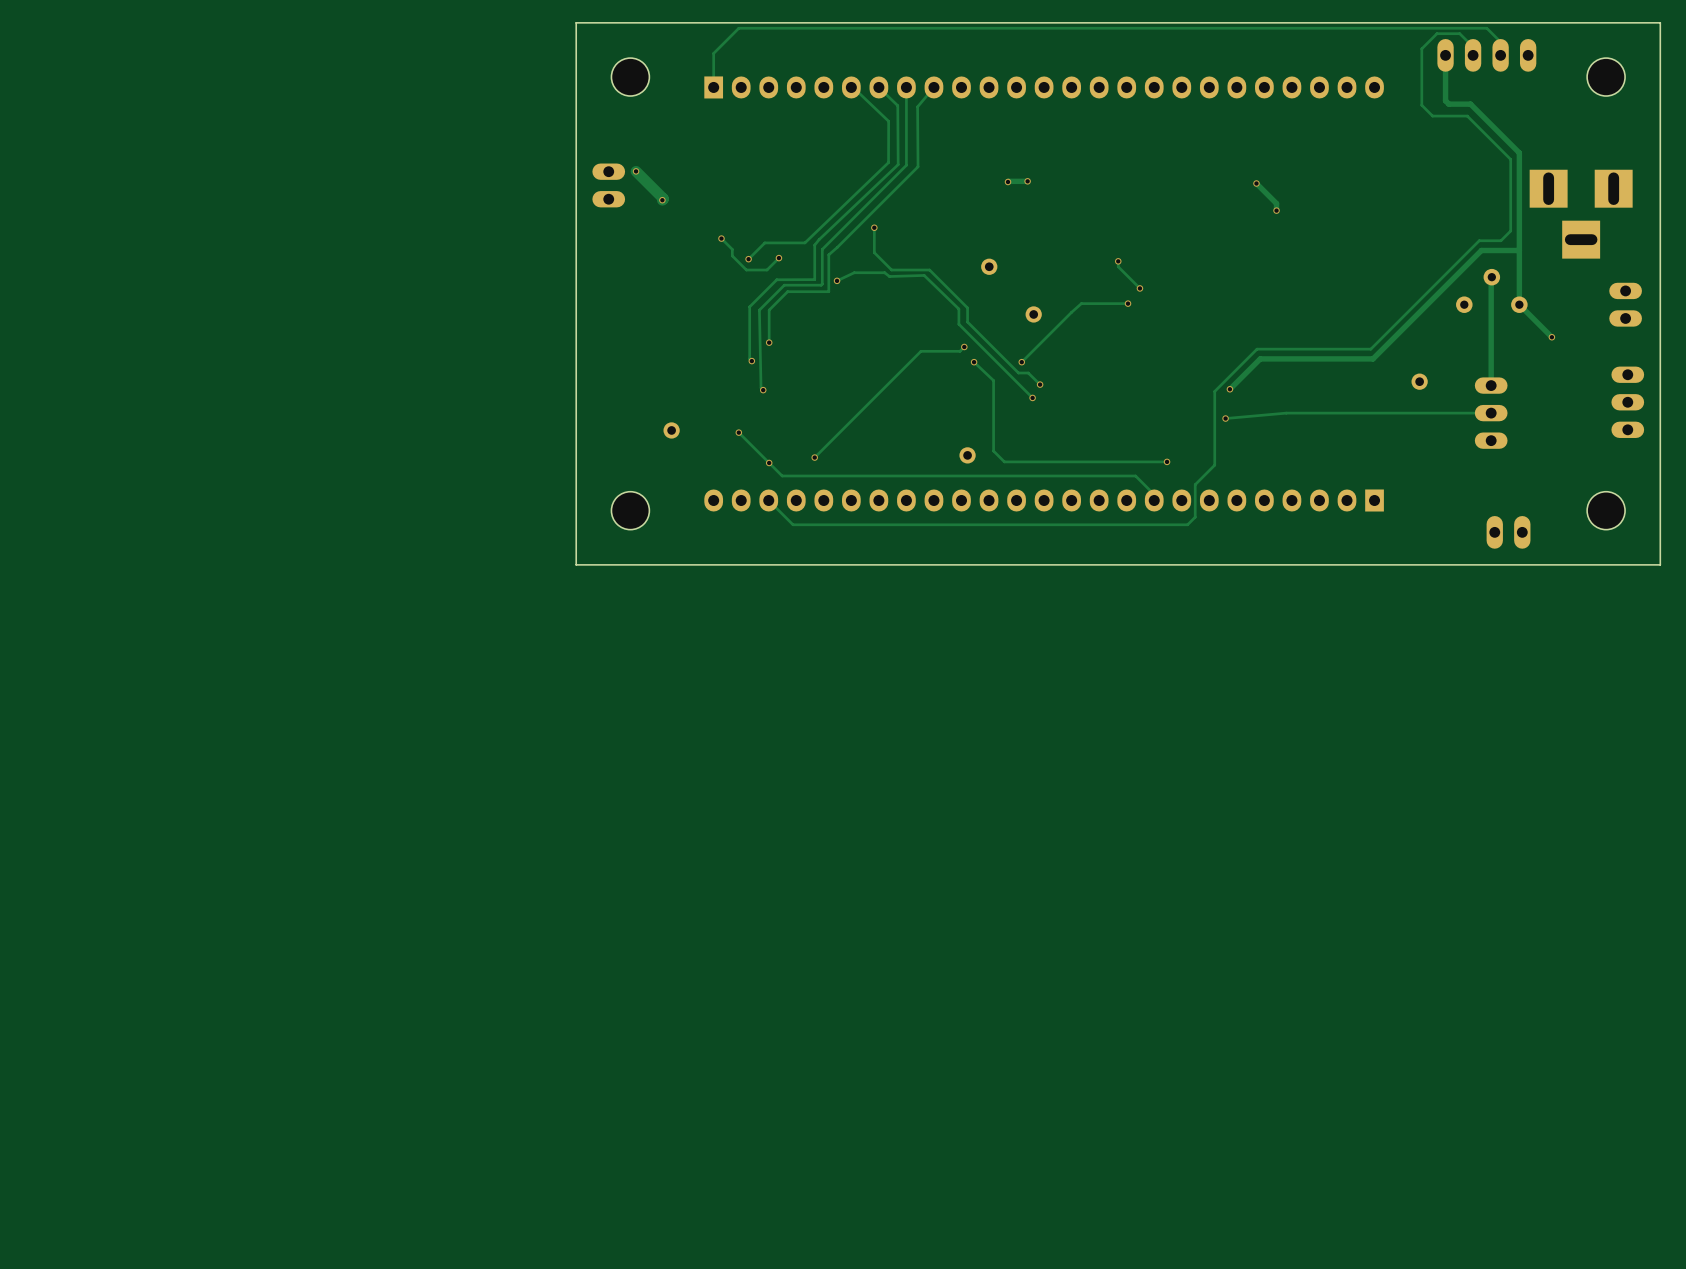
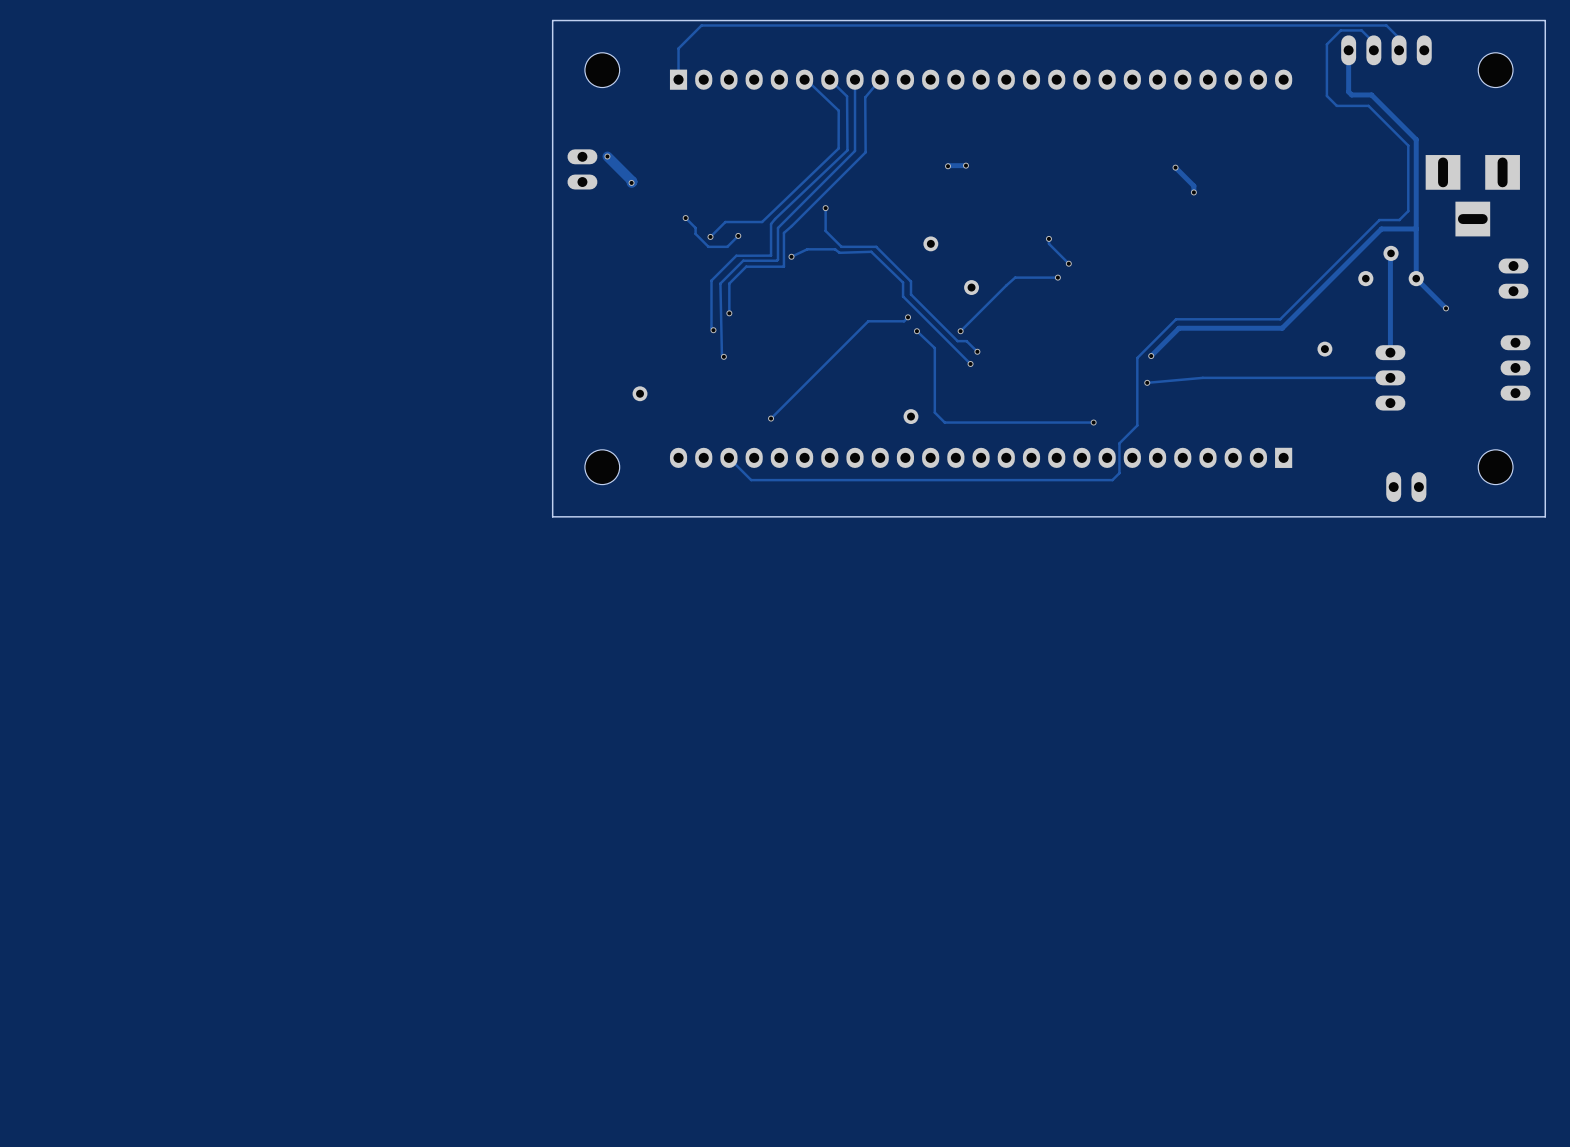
track: (738, 432) (782, 475) (1135, 475) (1154, 494) (1154, 500) -> none
via: (738, 432) -> none
via: (769, 462) -> none

